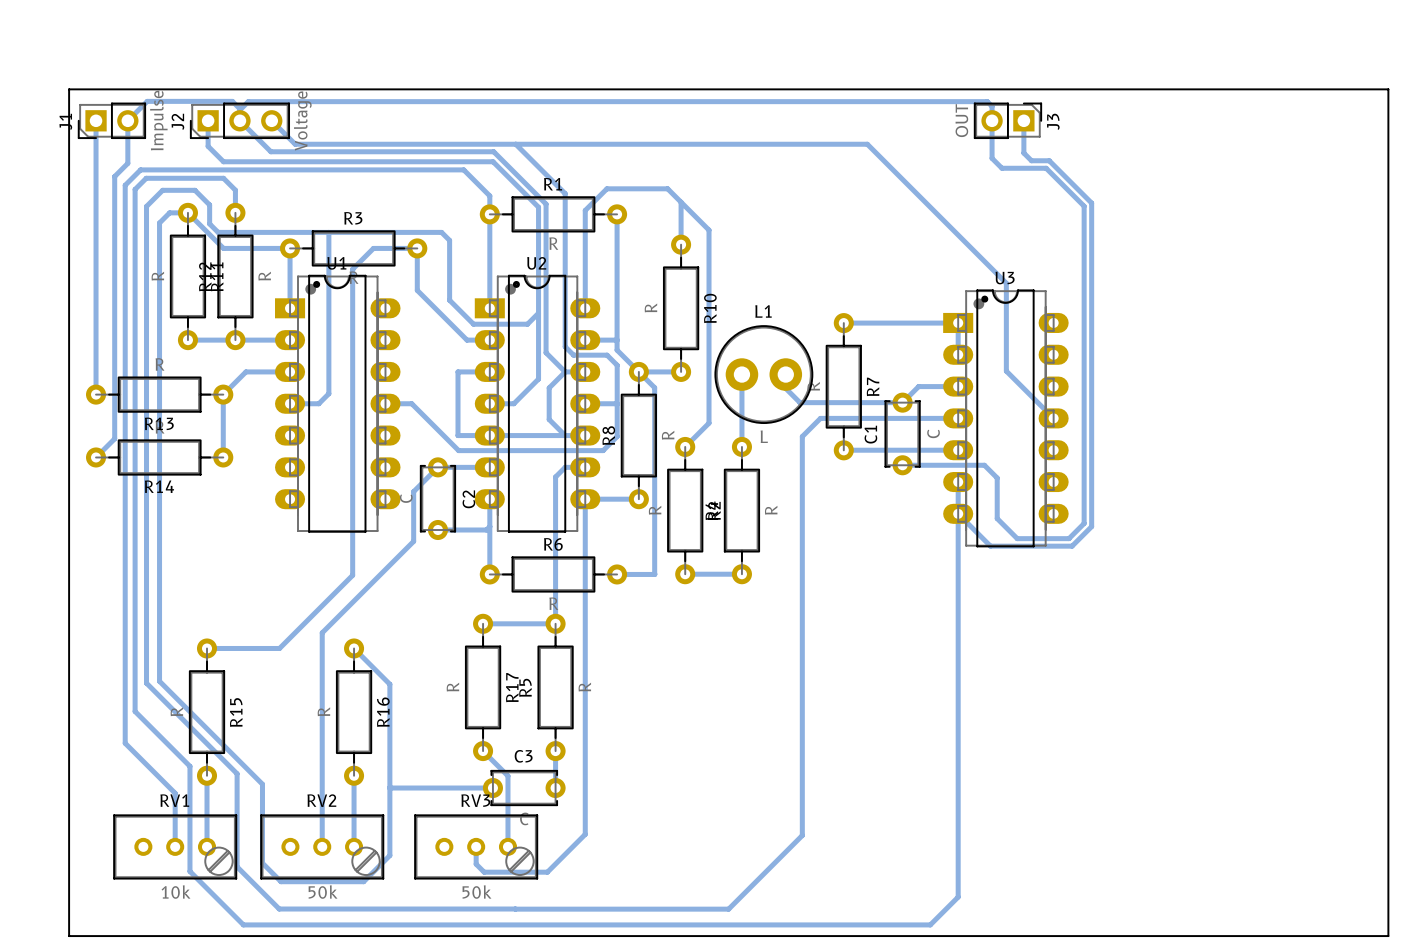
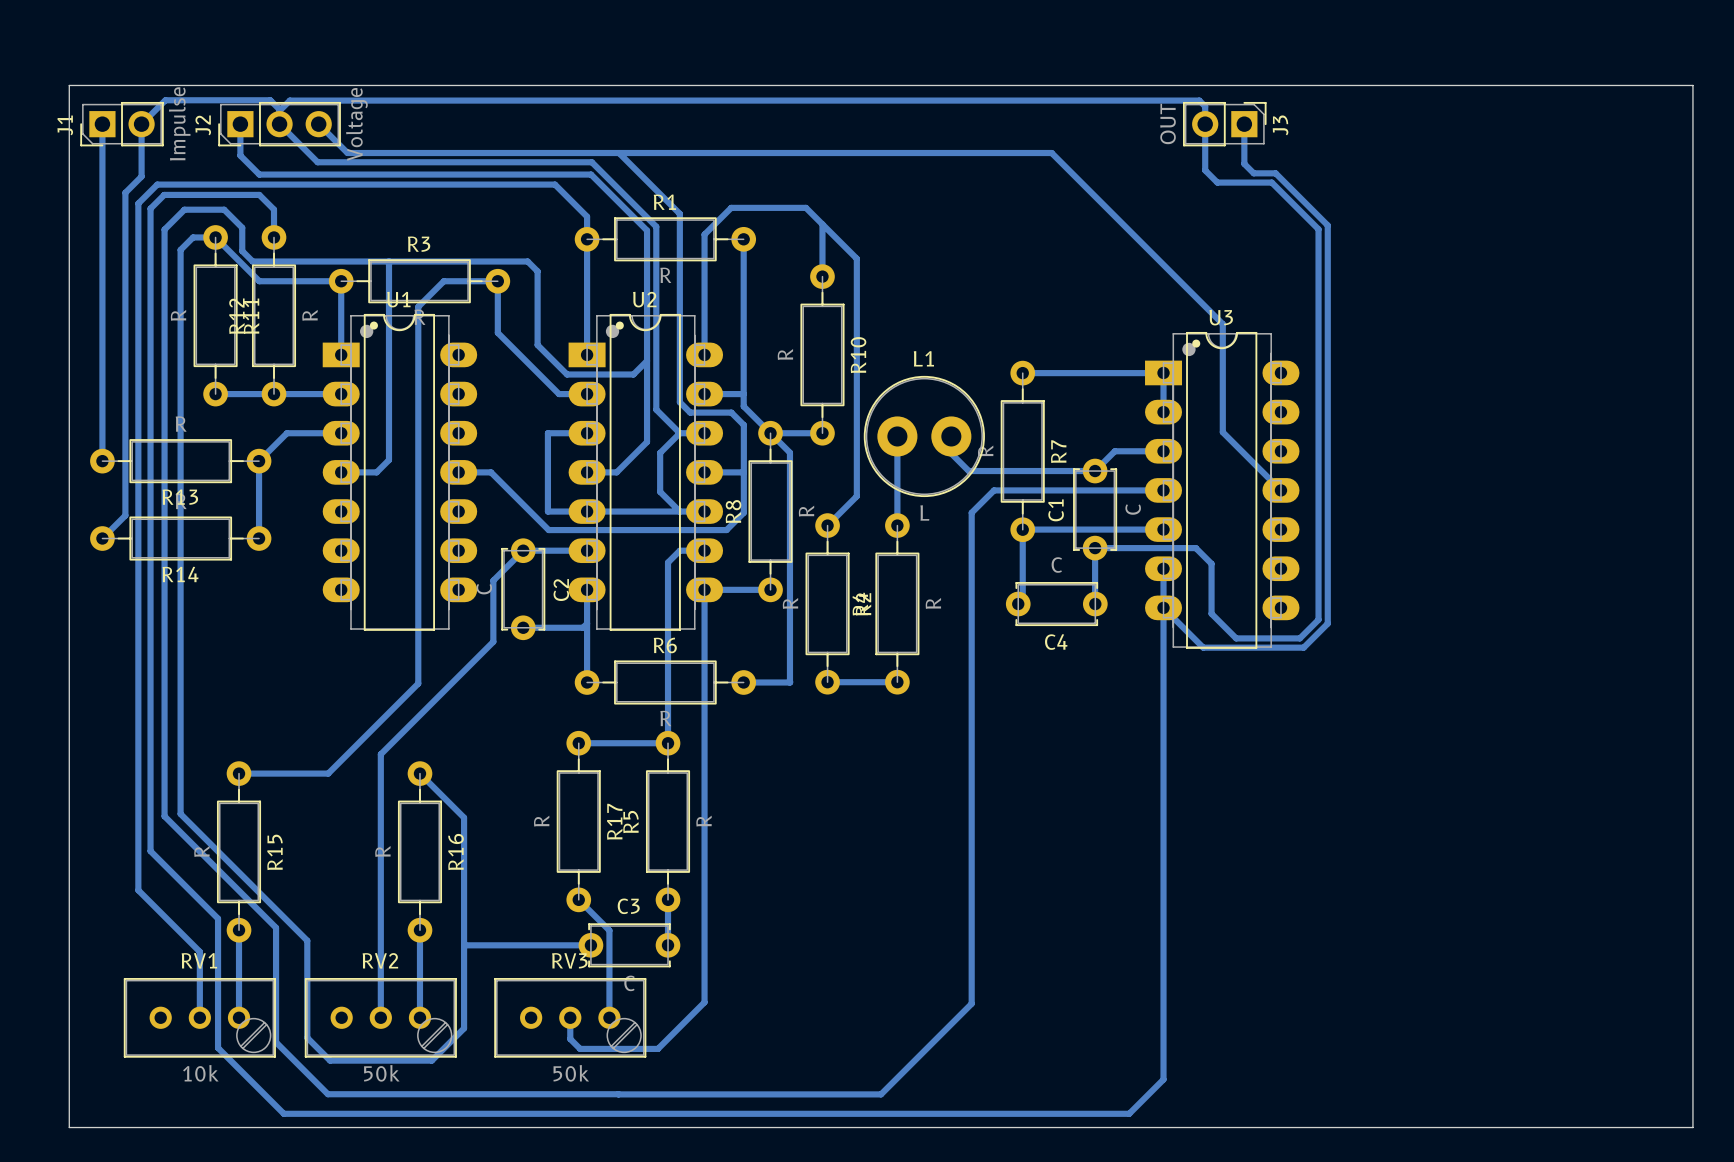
bottom track: none -> (1022, 529) (1022, 599) (1018, 604)
bottom track: none -> (1095, 548) (1095, 603)
C4: none -> C (1056, 604)

